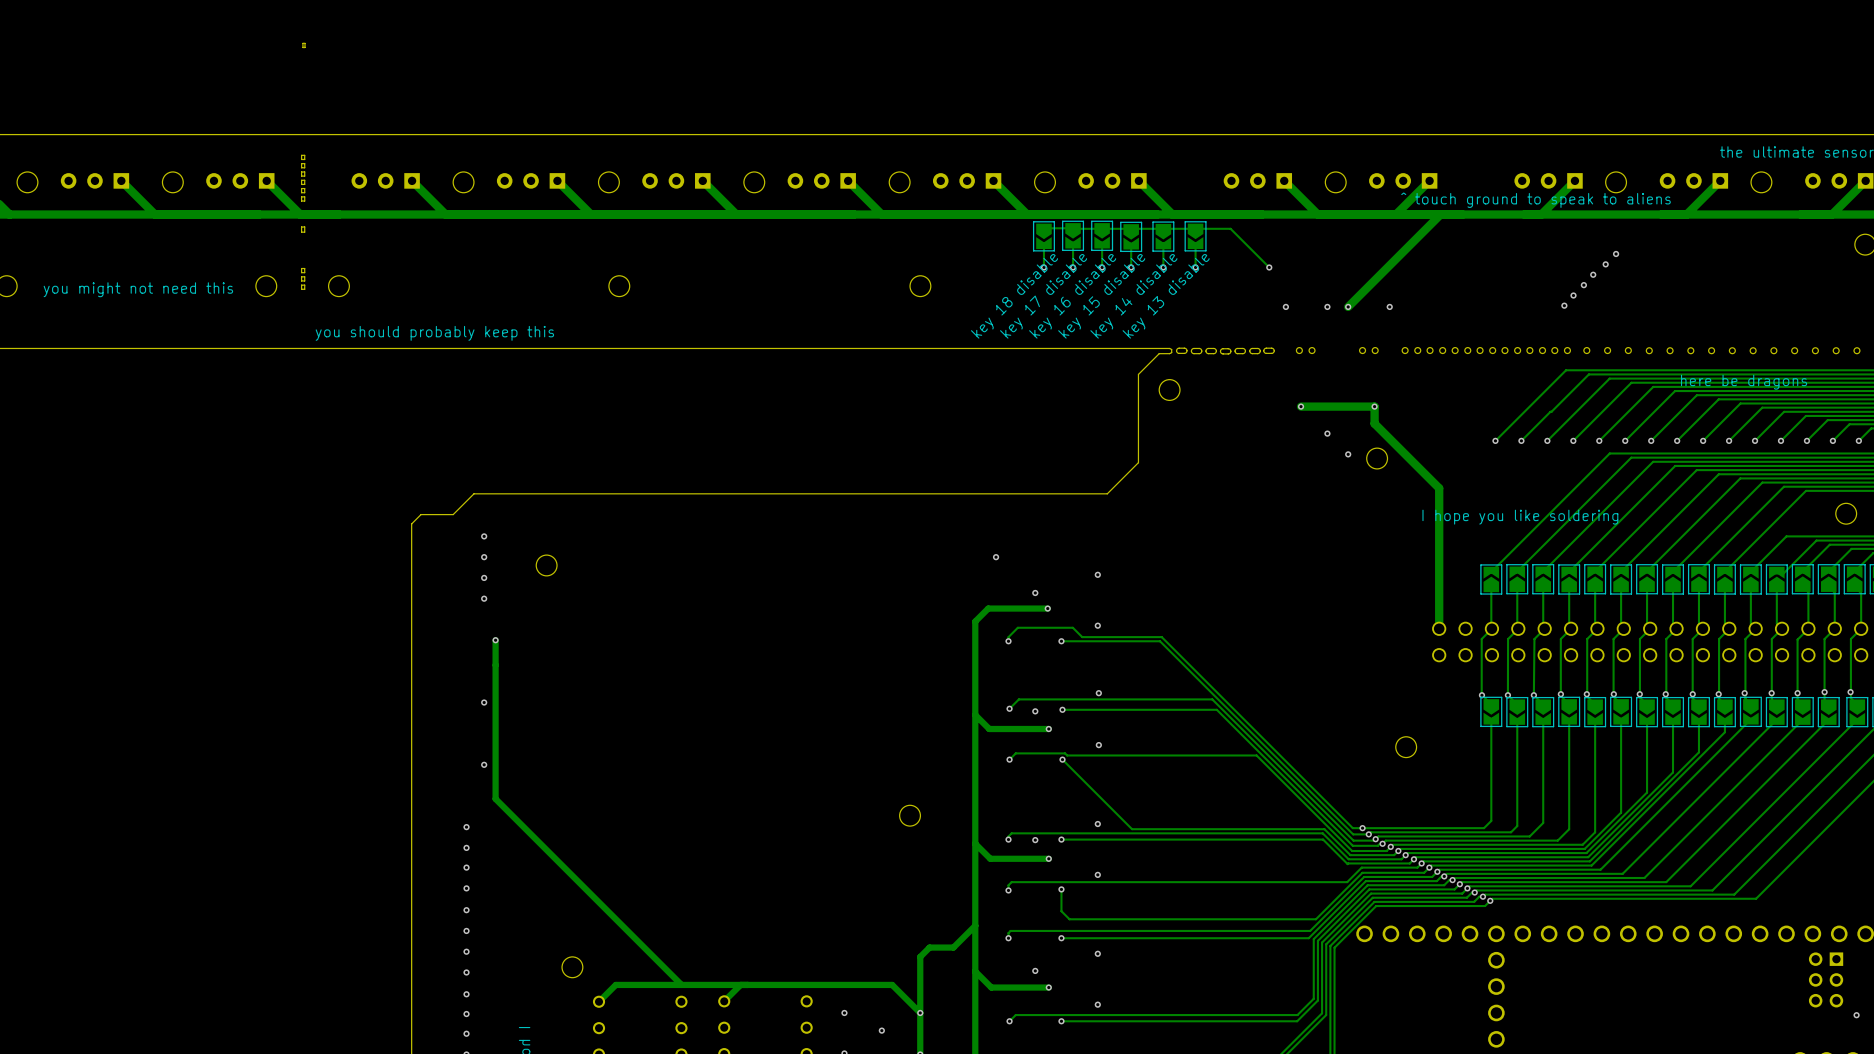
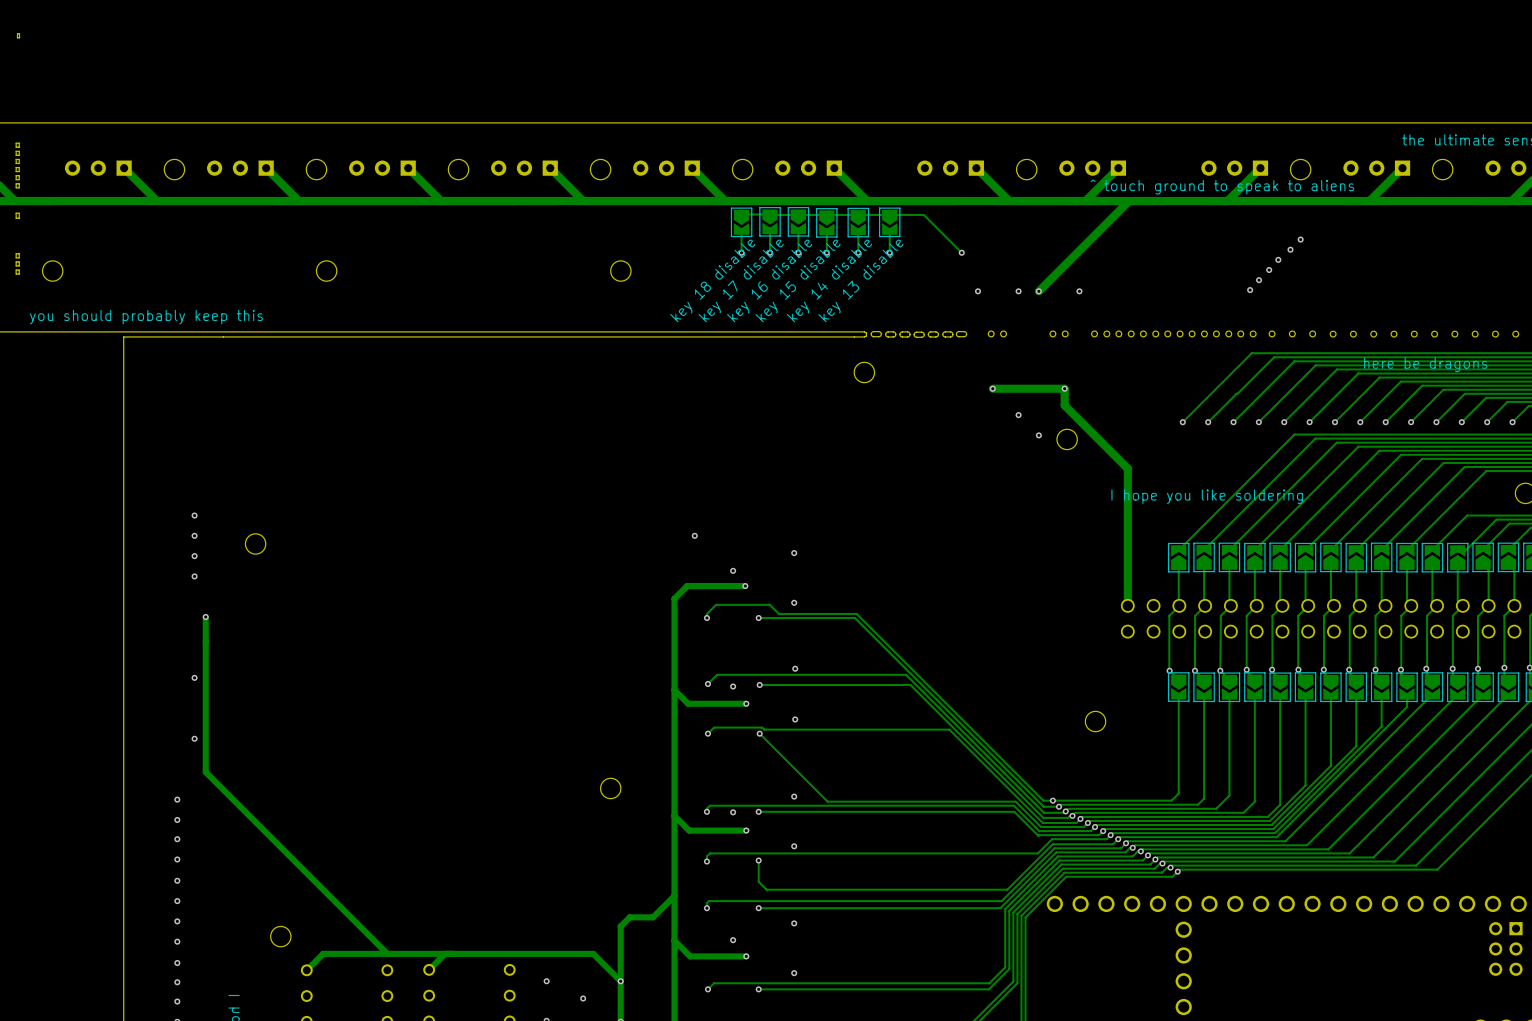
board edge: (1159, 353) (1138, 374) (1138, 462) (1107, 493) (473, 493) (453, 514) (421, 514) (411, 523) -> (854, 336) (123, 336) (123, 503)

